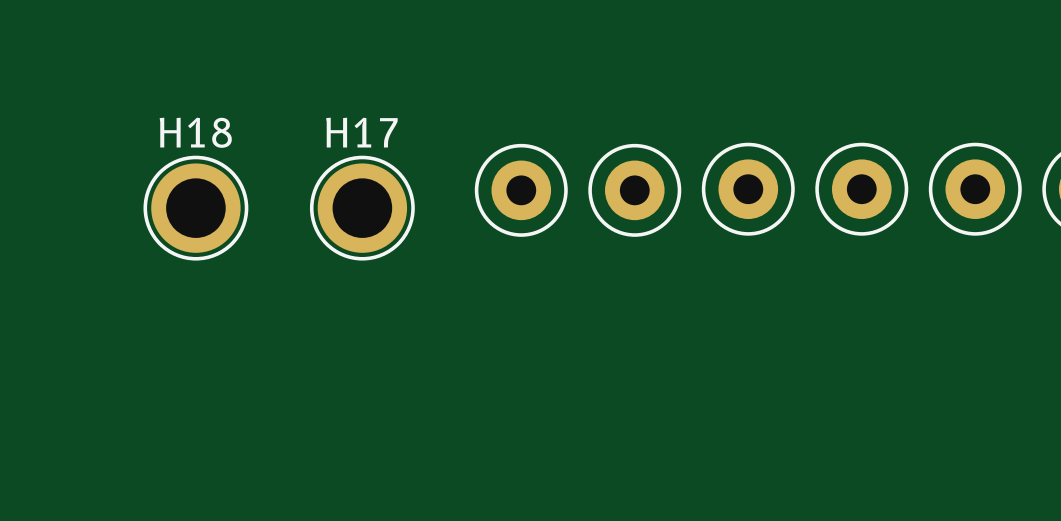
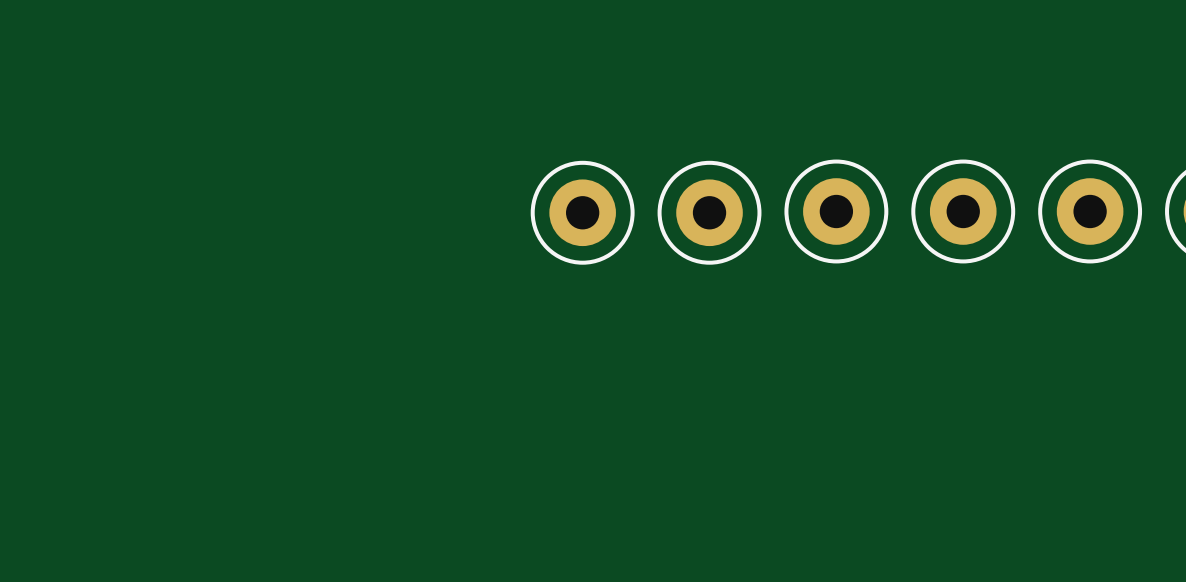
H18: (195, 208) -> none
H17: (362, 208) -> none

